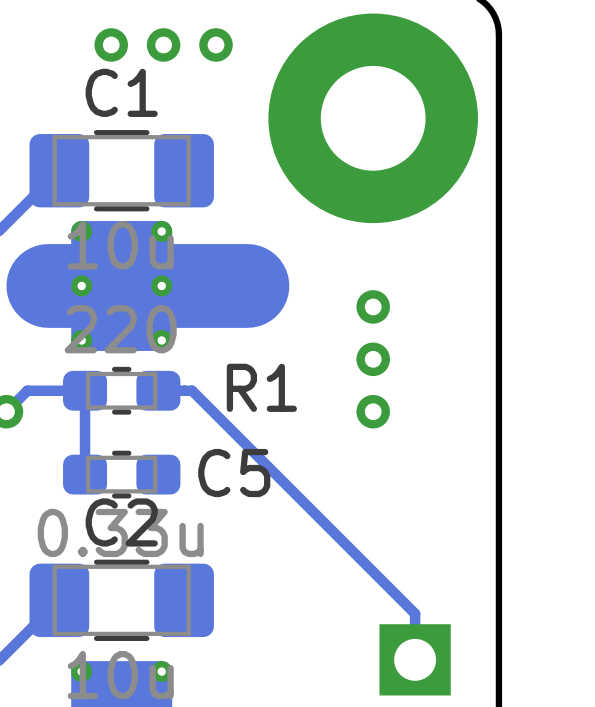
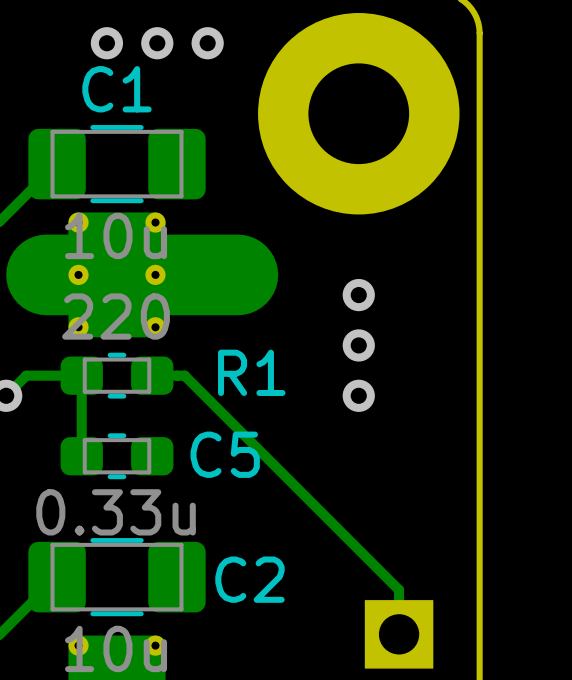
C2 name position: C2 (121, 522) -> C2 (249, 579)

